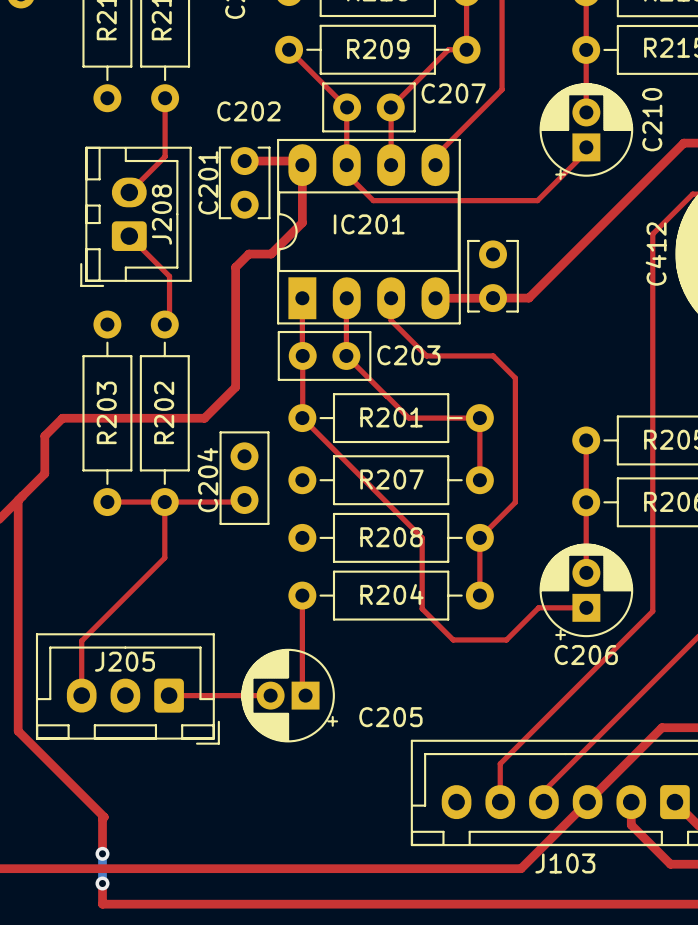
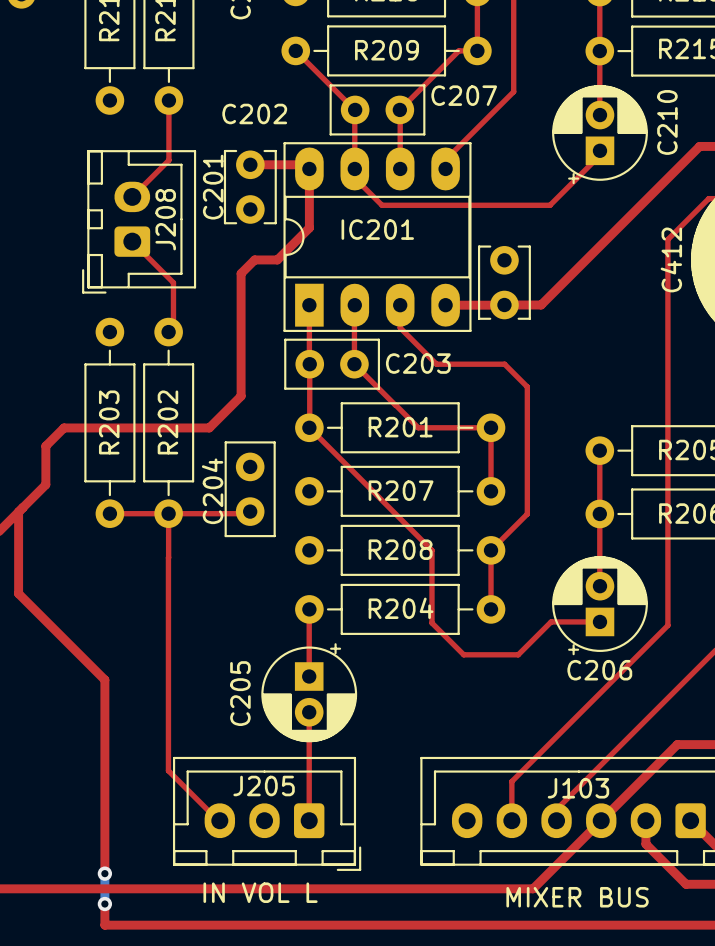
top track: (164, 544) (164, 557) (81, 640) (81, 695) -> (168, 557) (168, 770) (219, 820)
top track: (18, 580) (18, 731) (104, 817) (102, 818) -> (18, 593) (104, 679) (104, 837)
top track: (302, 595) (302, 692) (305, 695) -> (309, 609) (309, 676)
J205 position: (127, 688) -> (267, 813)
top track: (169, 695) (270, 695) -> none
C205 rotation: 0° (289, 695) -> 90° counterclockwise (309, 692)
top track: none -> (309, 712) (309, 820)
C205 name position: C205 (390, 717) -> C205 (240, 693)
J103 name position: J103 (565, 863) -> J103 (578, 788)
text: none -> IN VOL L (260, 892)
text: none -> MIXER BUS (577, 897)

